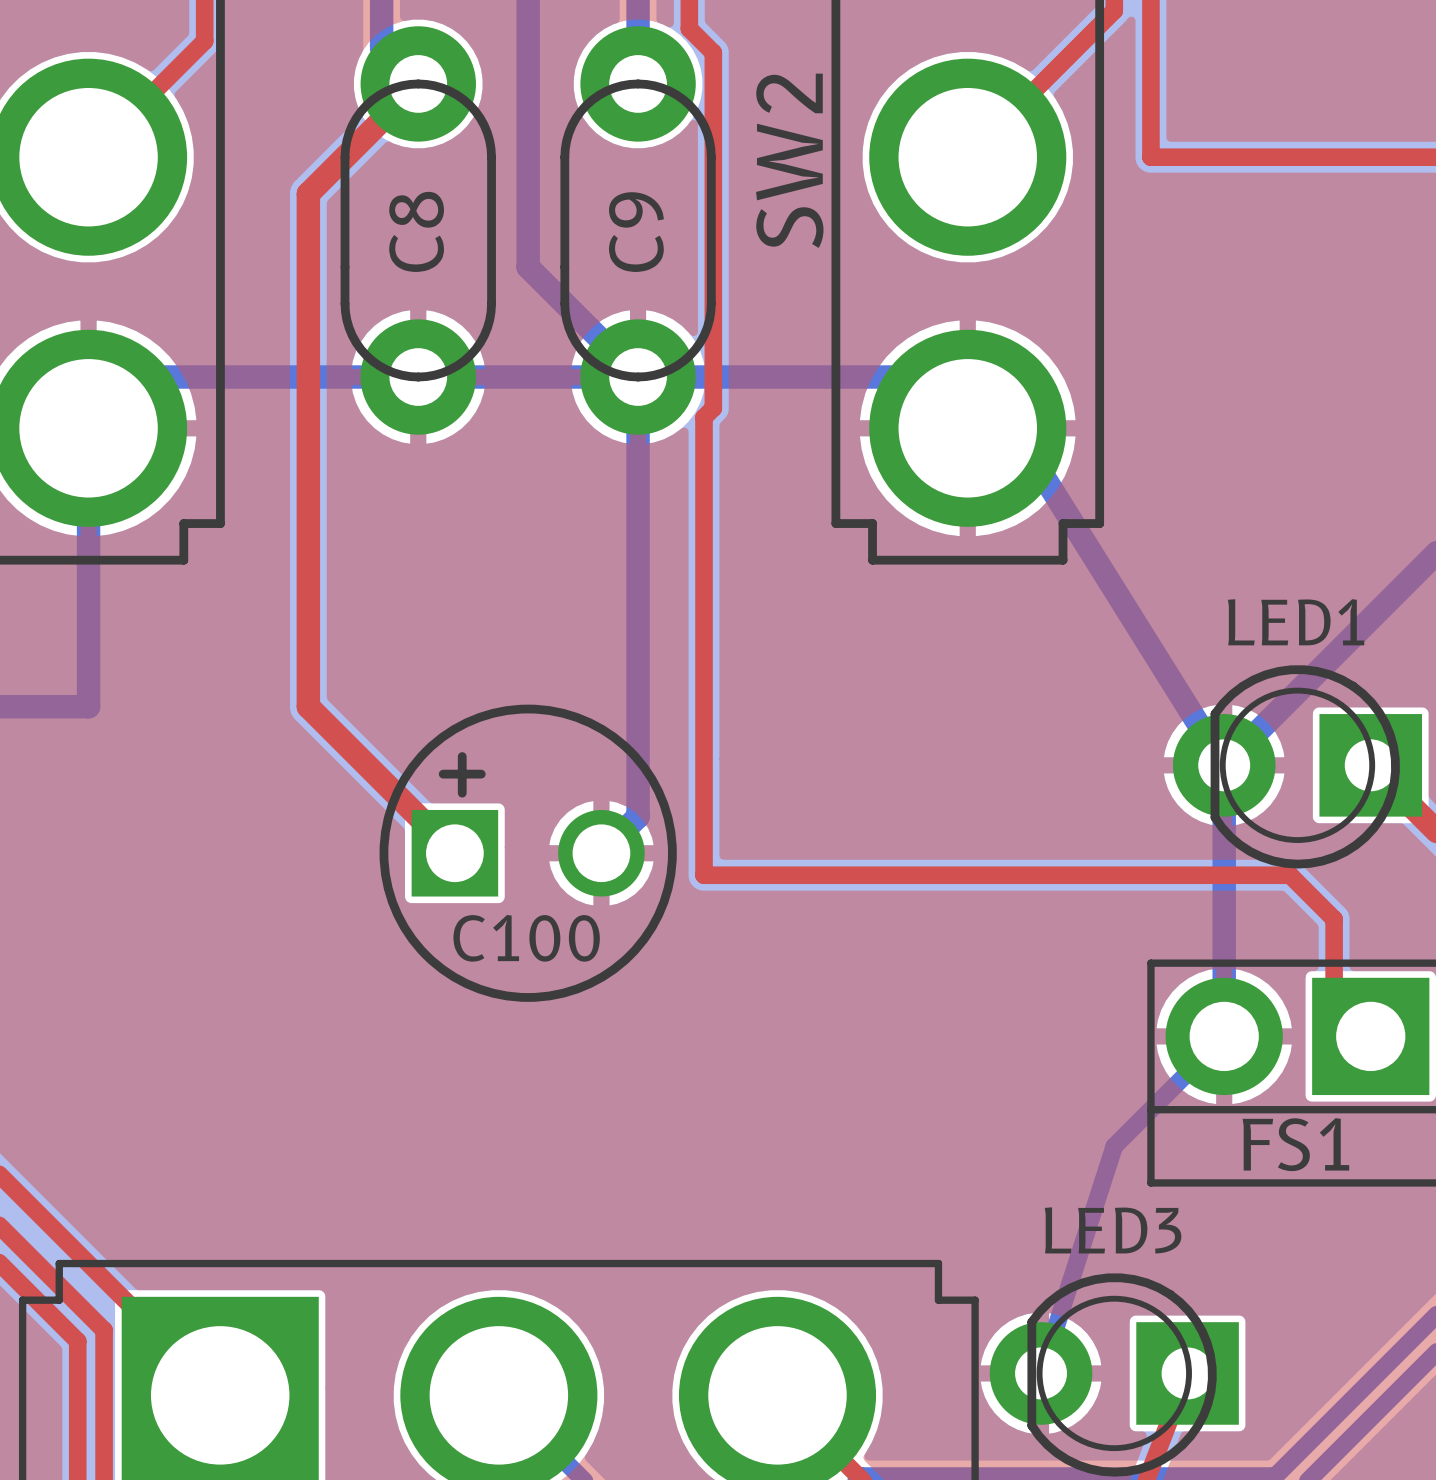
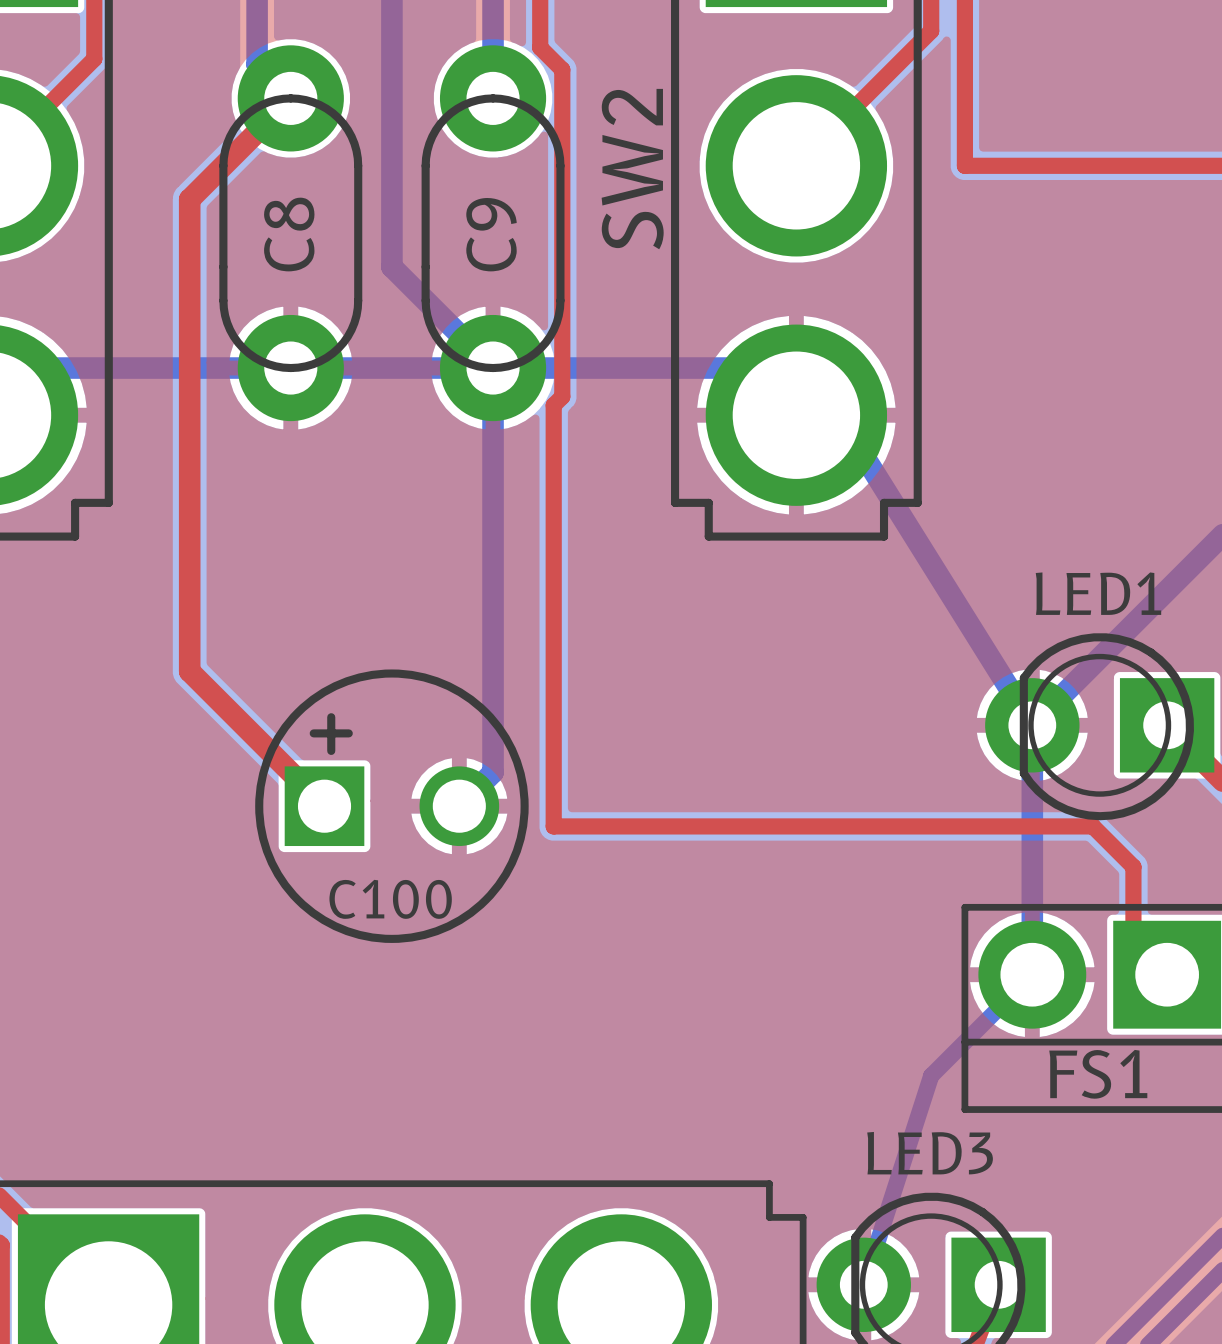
C100 name position: C100 (526, 938) -> C100 (390, 899)

